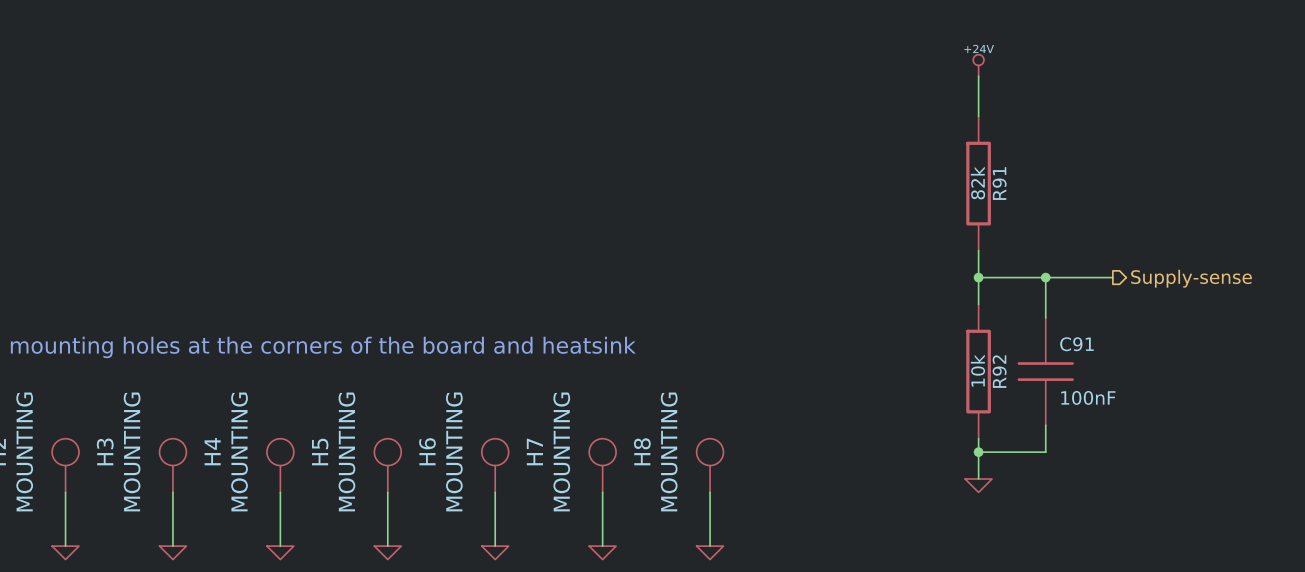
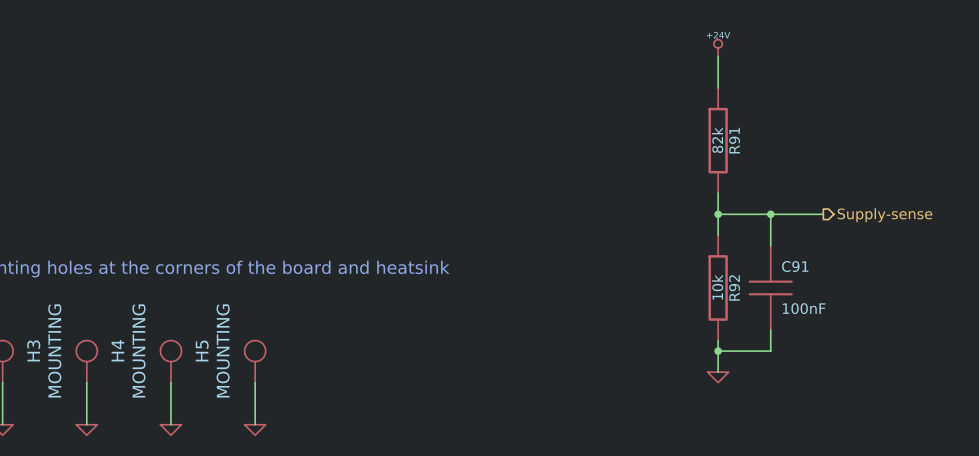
H6: MOUNTING (495, 465) -> none
H7: MOUNTING (602, 465) -> none
H8: MOUNTING (710, 465) -> none
wire: (495, 492) (495, 546) -> none
wire: (602, 492) (602, 546) -> none
wire: (710, 492) (710, 546) -> none
power symbol: (495, 552) -> none
power symbol: (602, 552) -> none
power symbol: (710, 552) -> none

